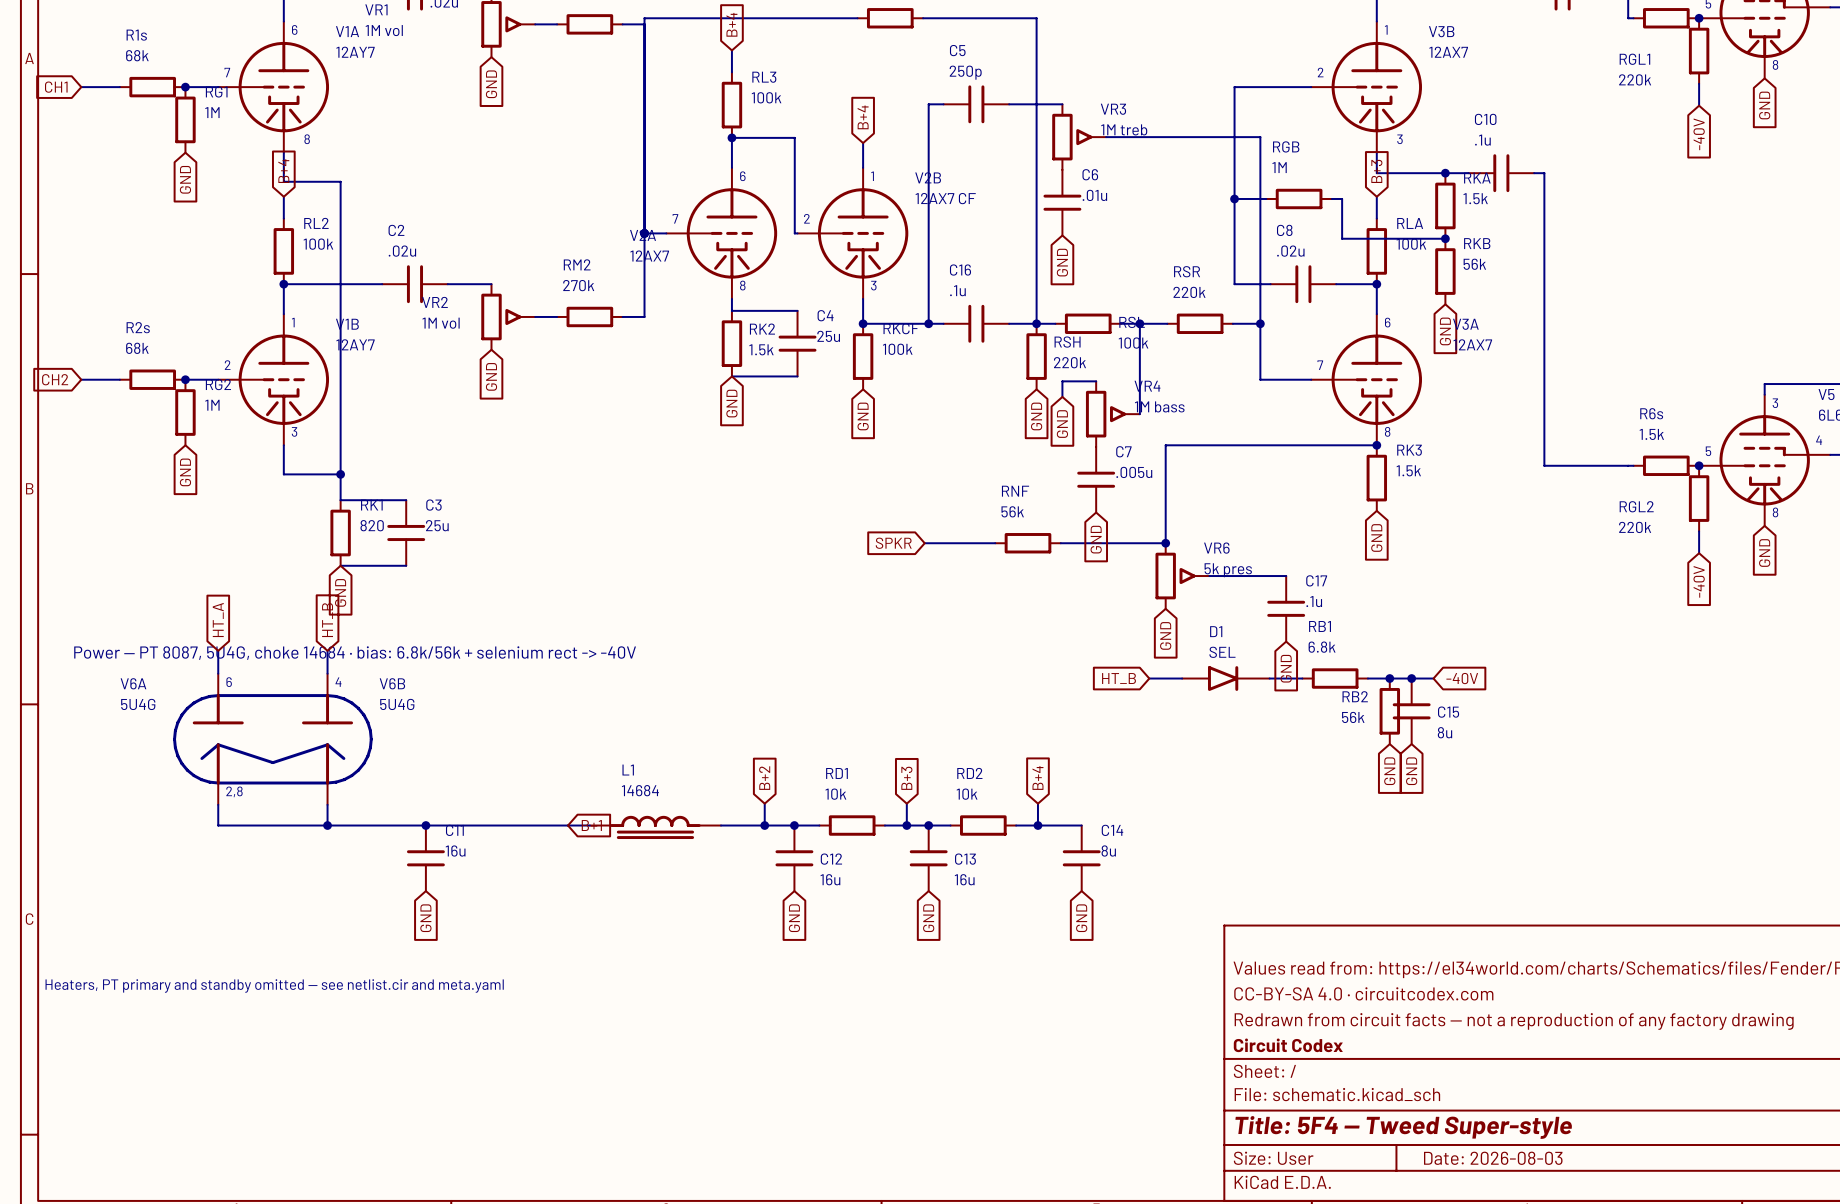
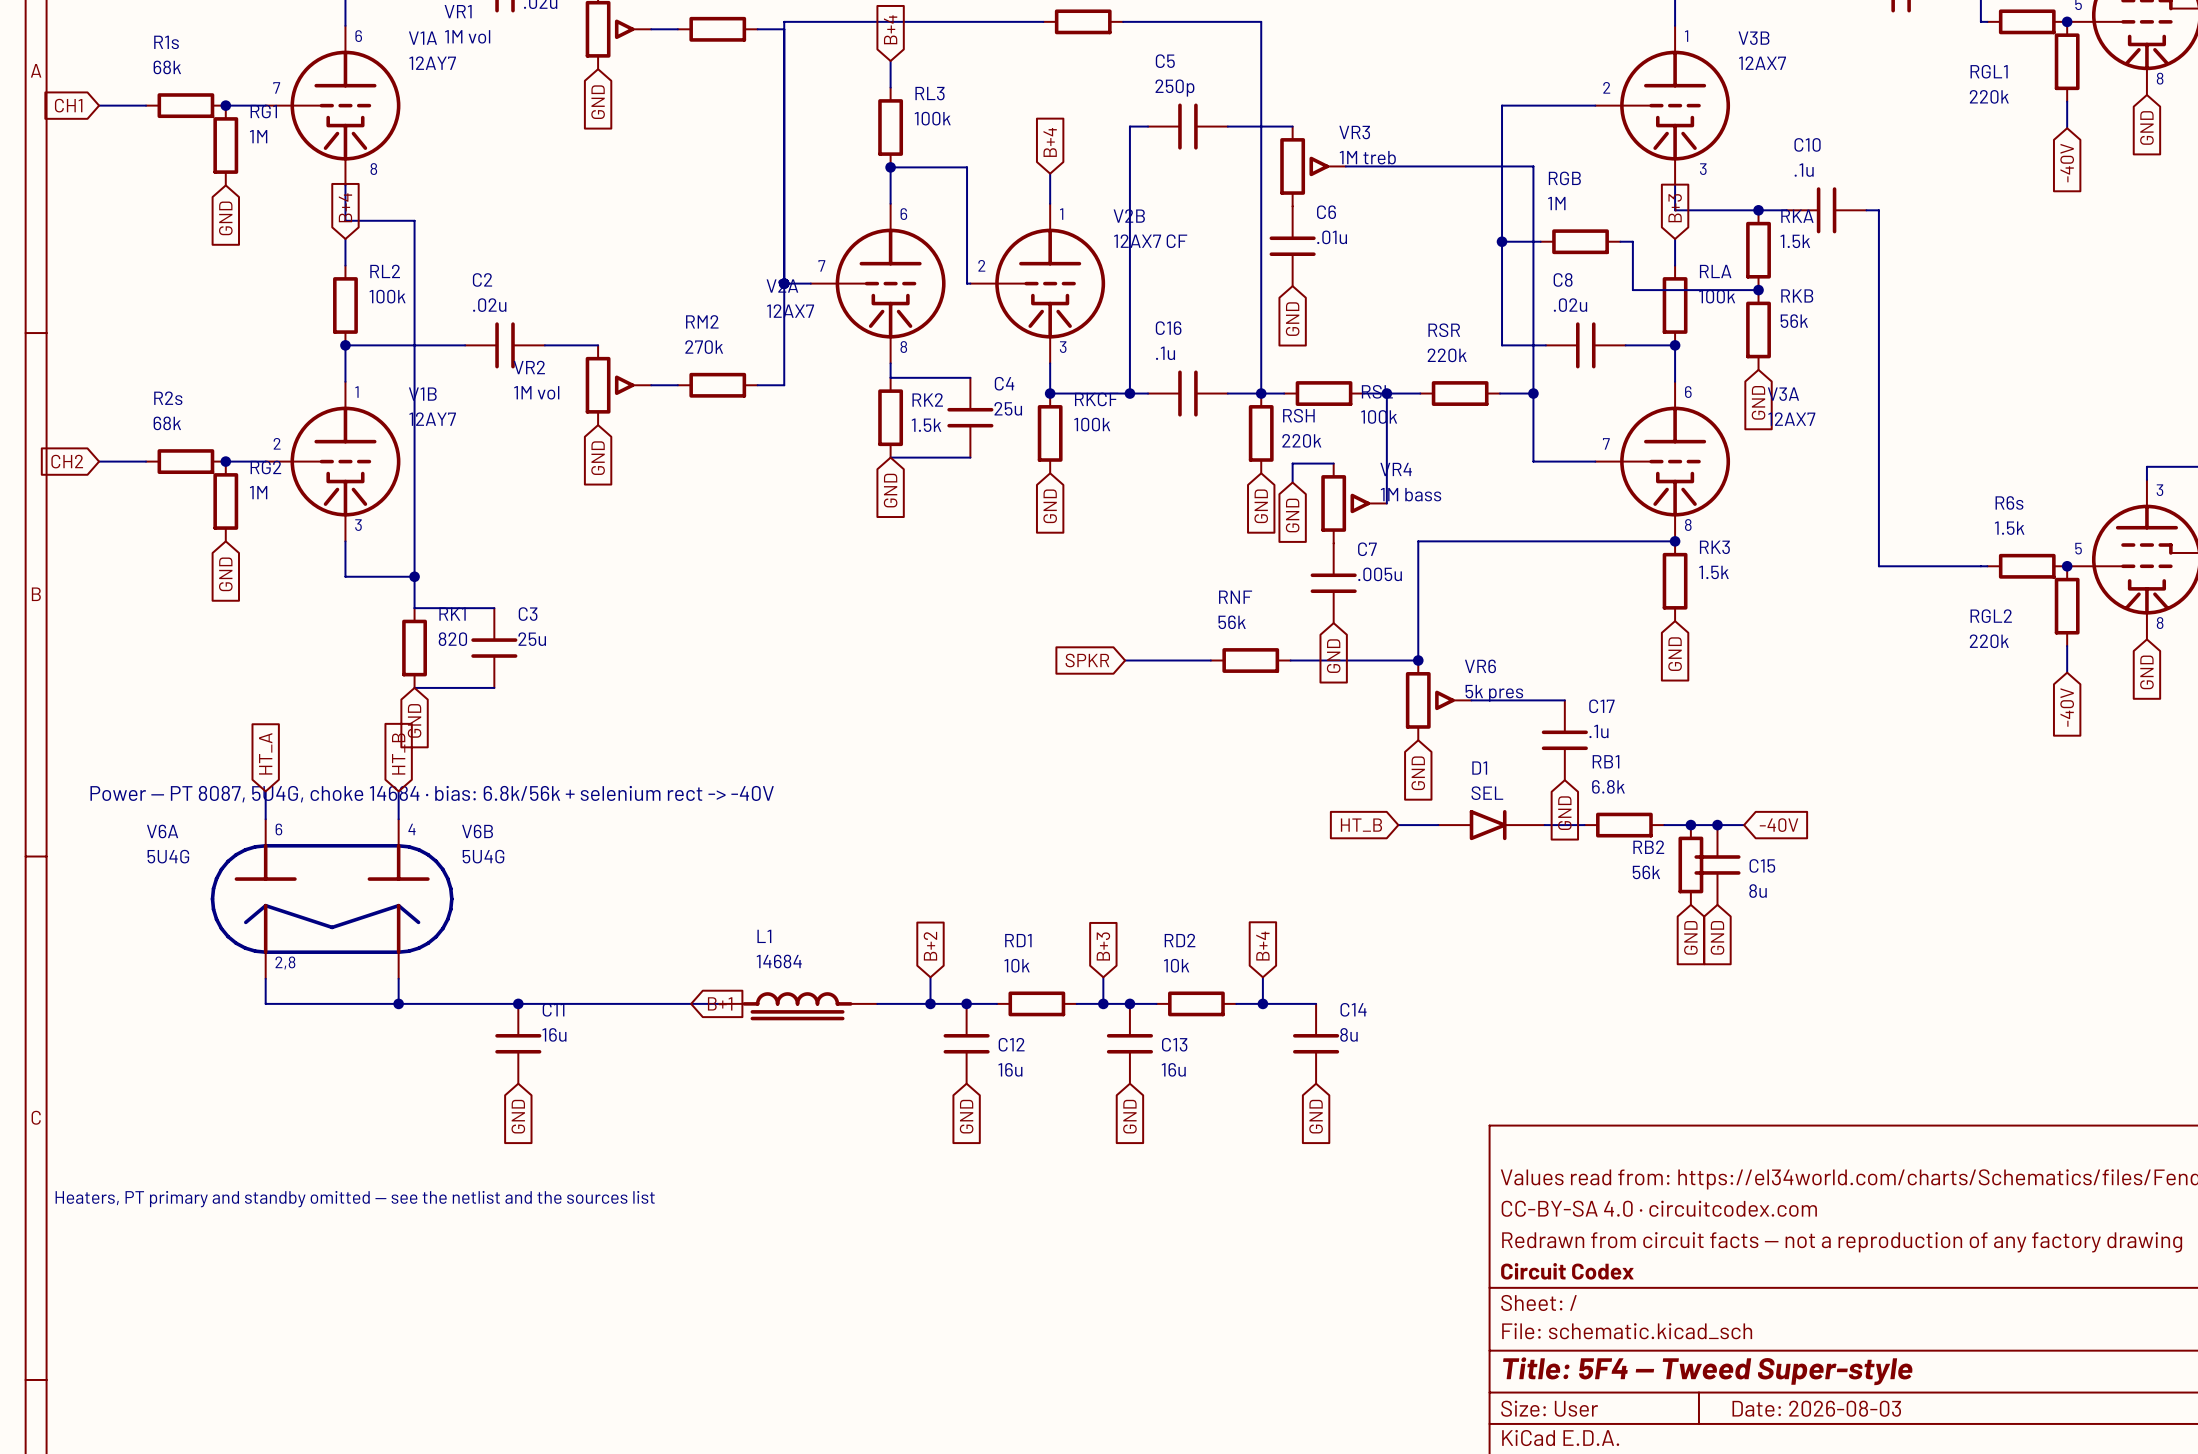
text: Heaters, PT primary and standby omitted — see netlist.cir and meta.yaml (274, 985) -> Heaters, PT primary and standby omitted — see the netlist and the sources list (355, 1199)

